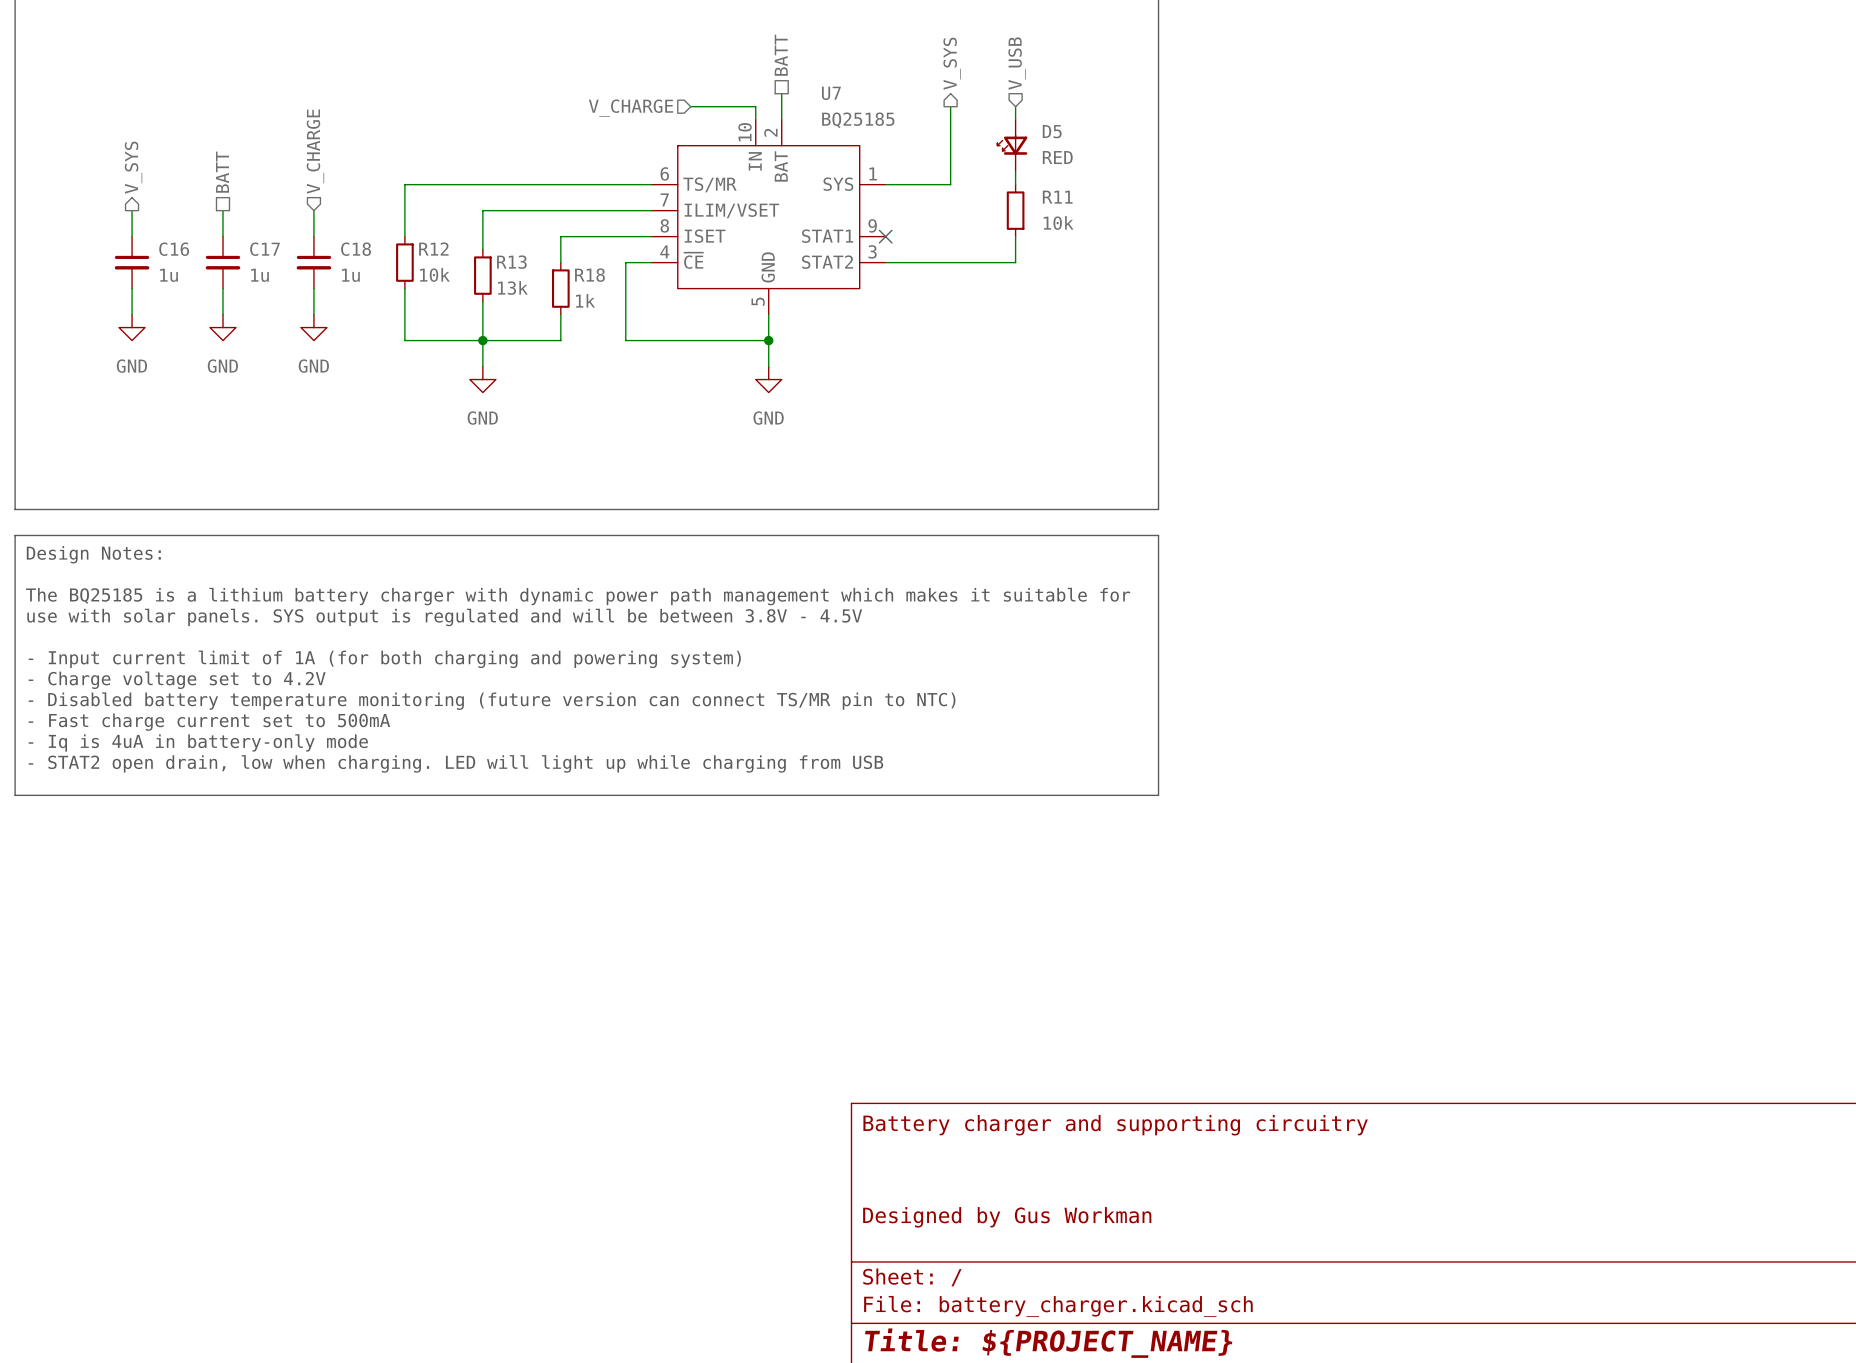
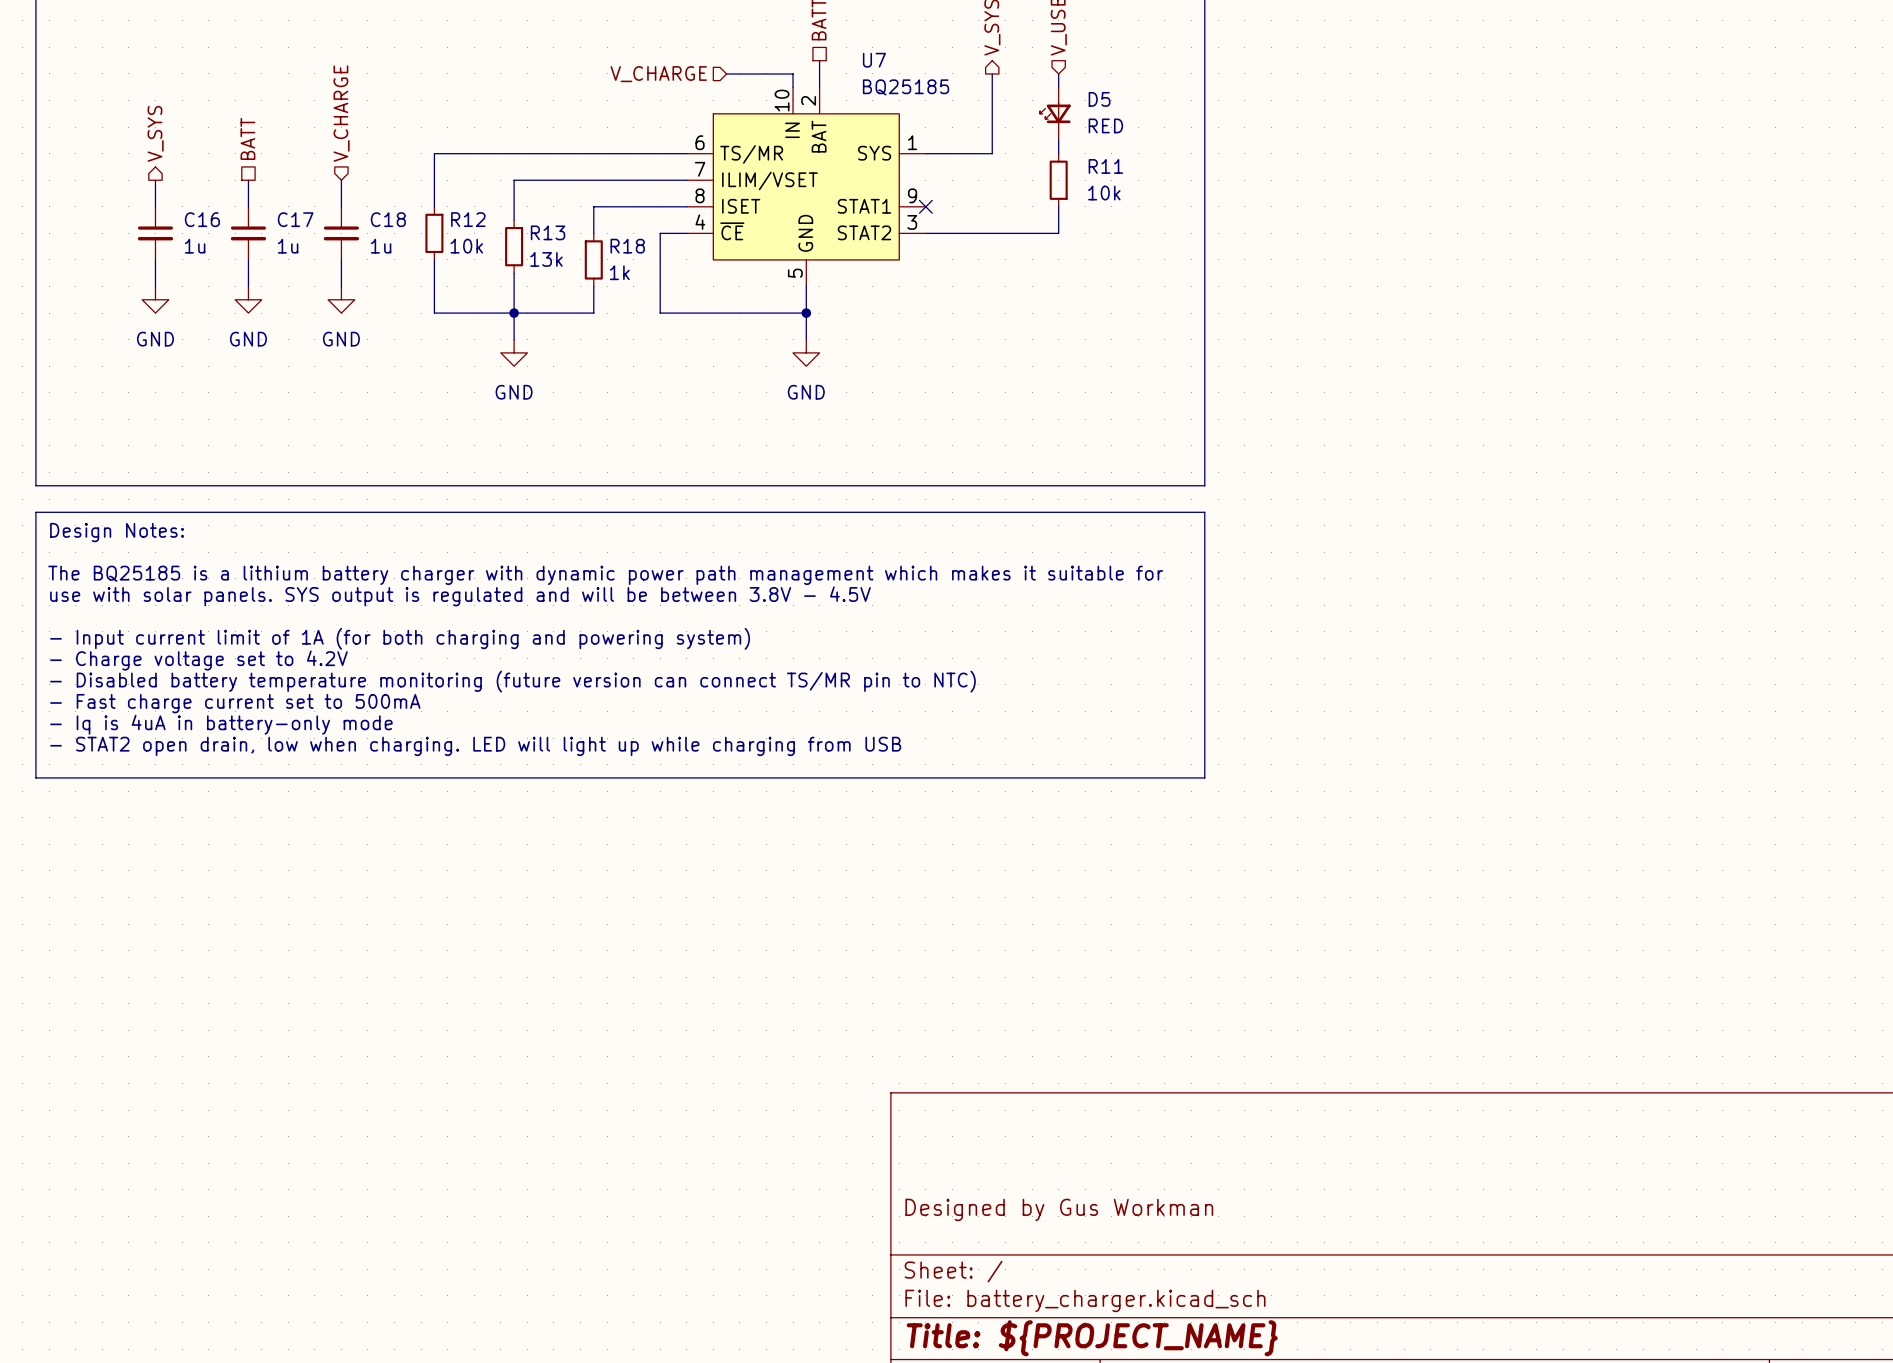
title block: Battery charger and supporting circuitry (1115, 1125) -> none

